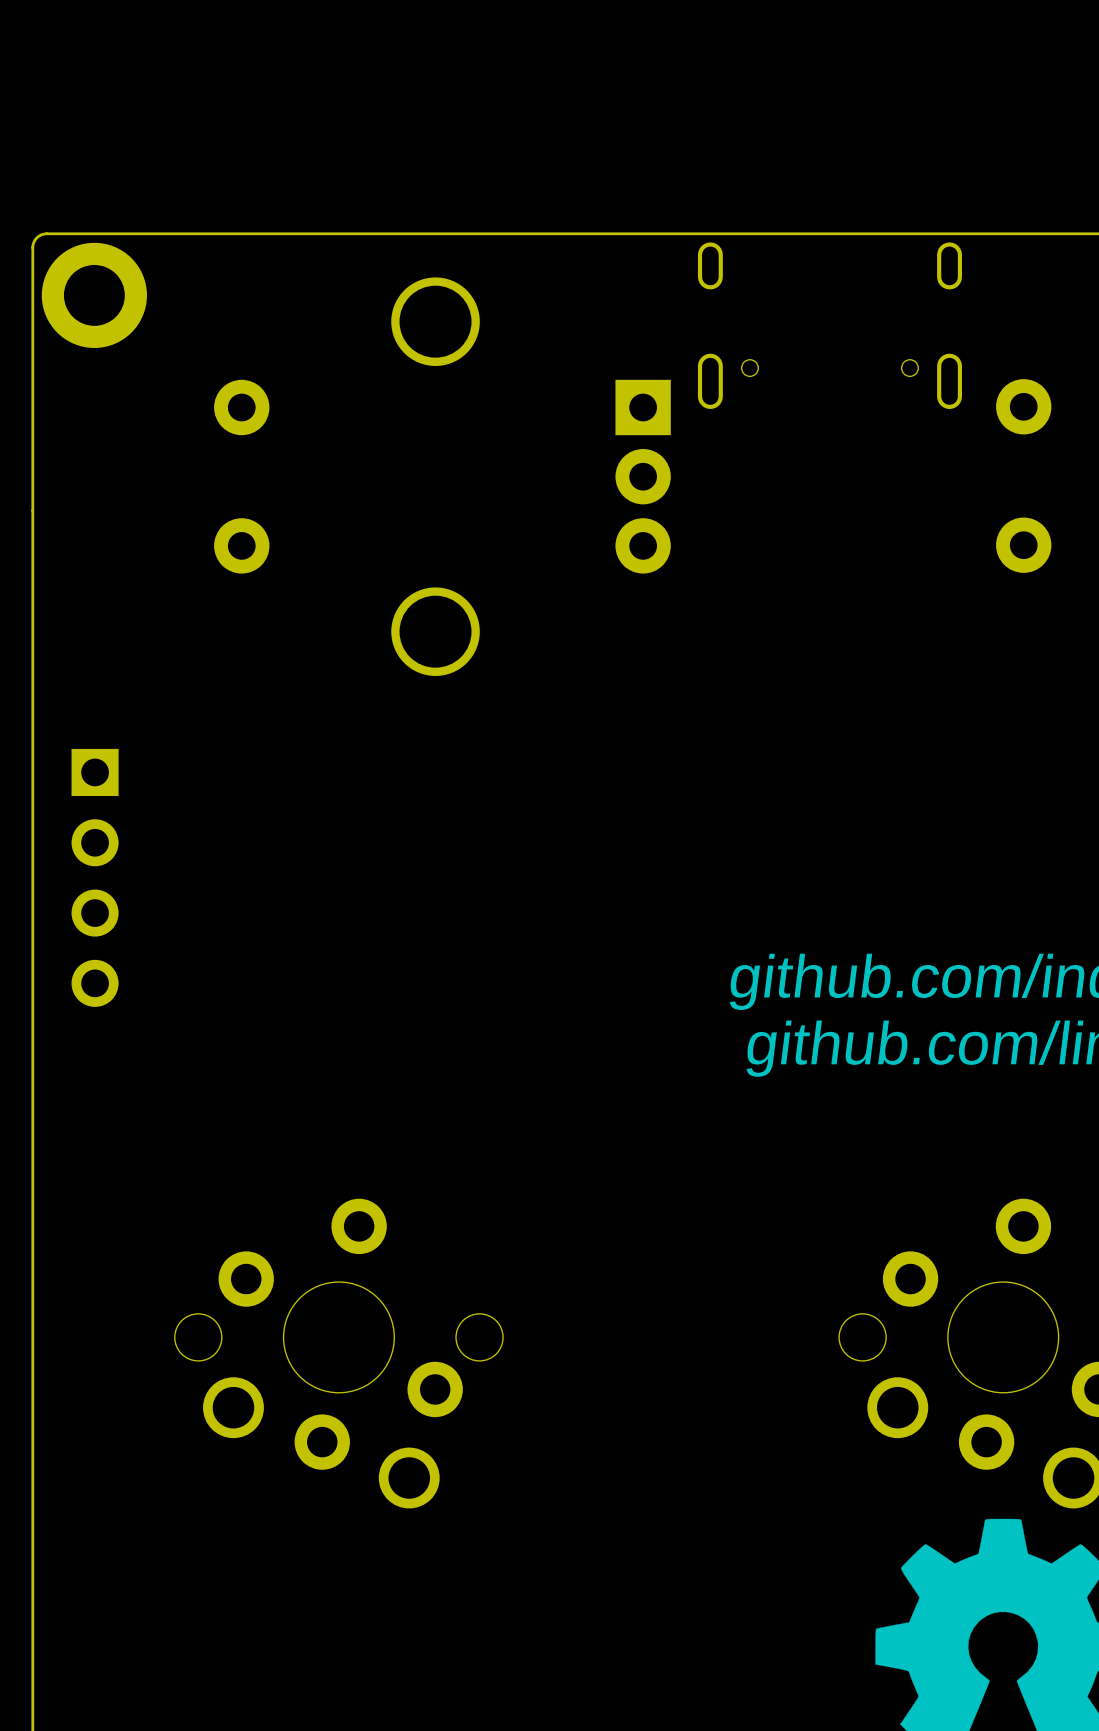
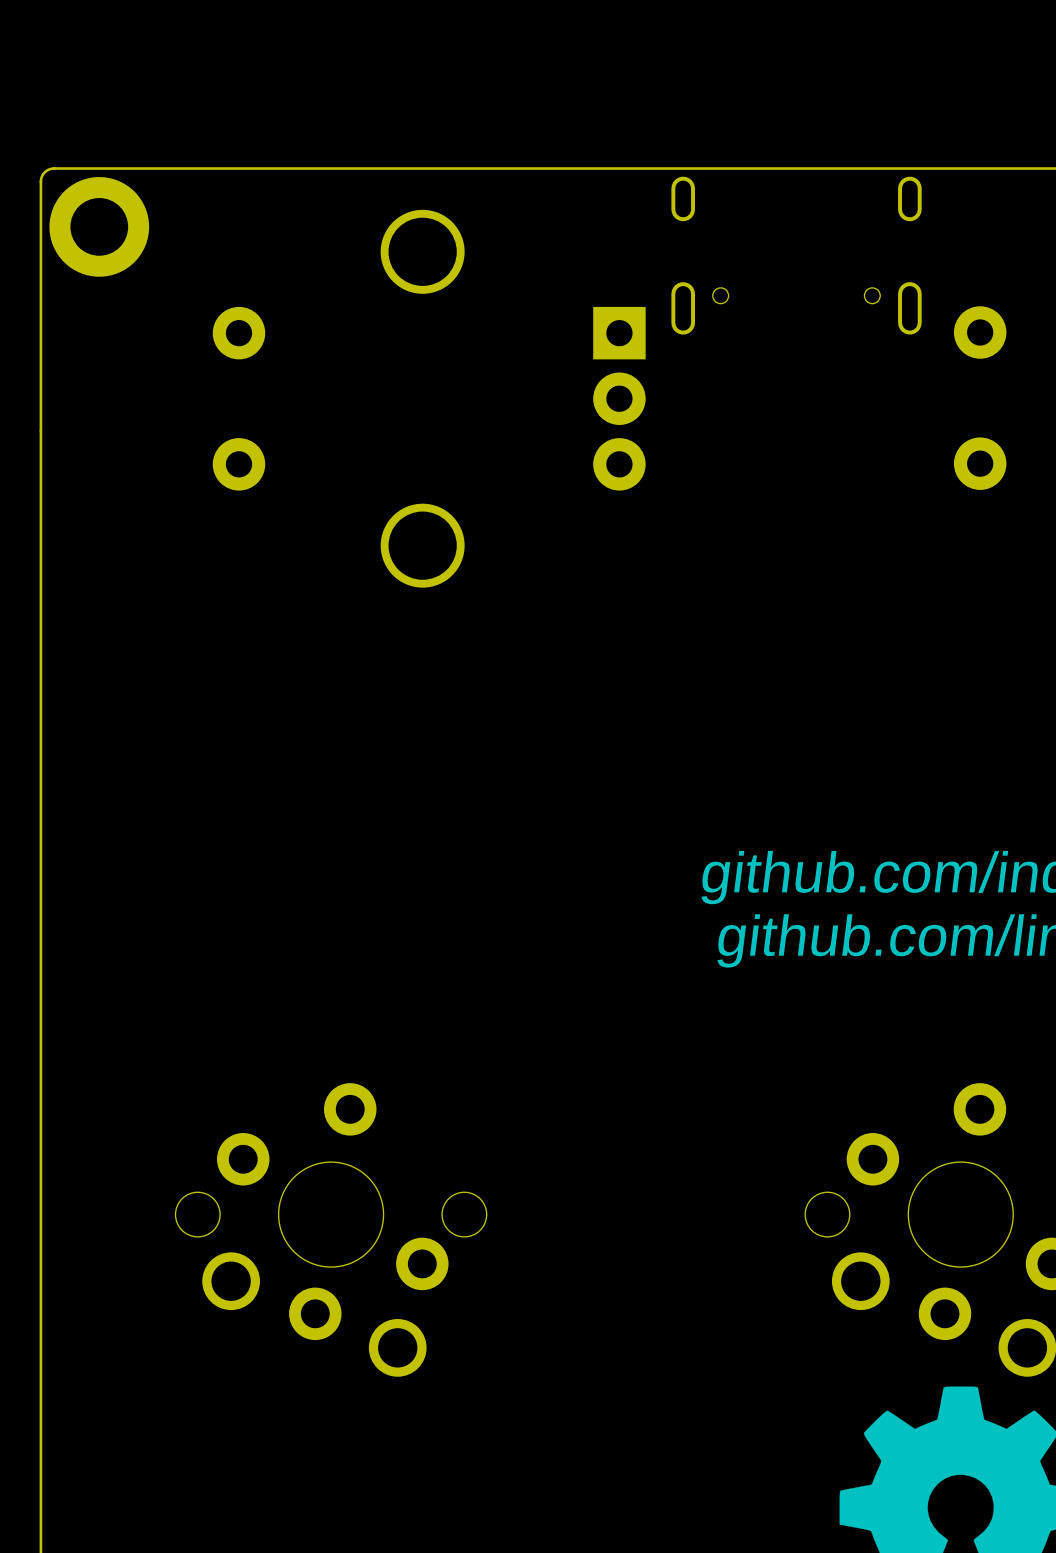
part: (95, 877) -> none

